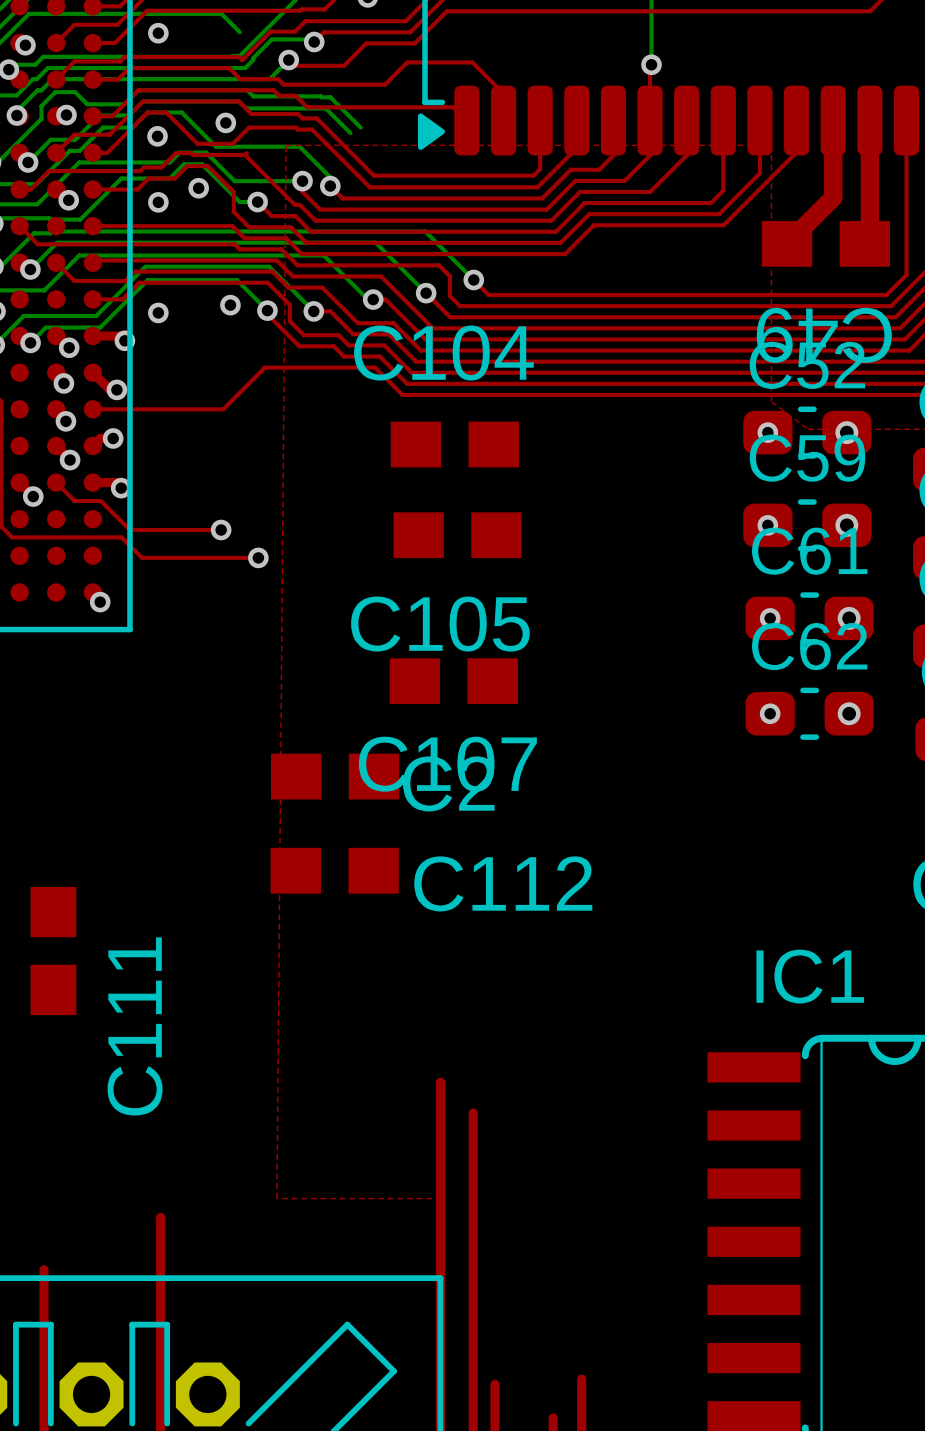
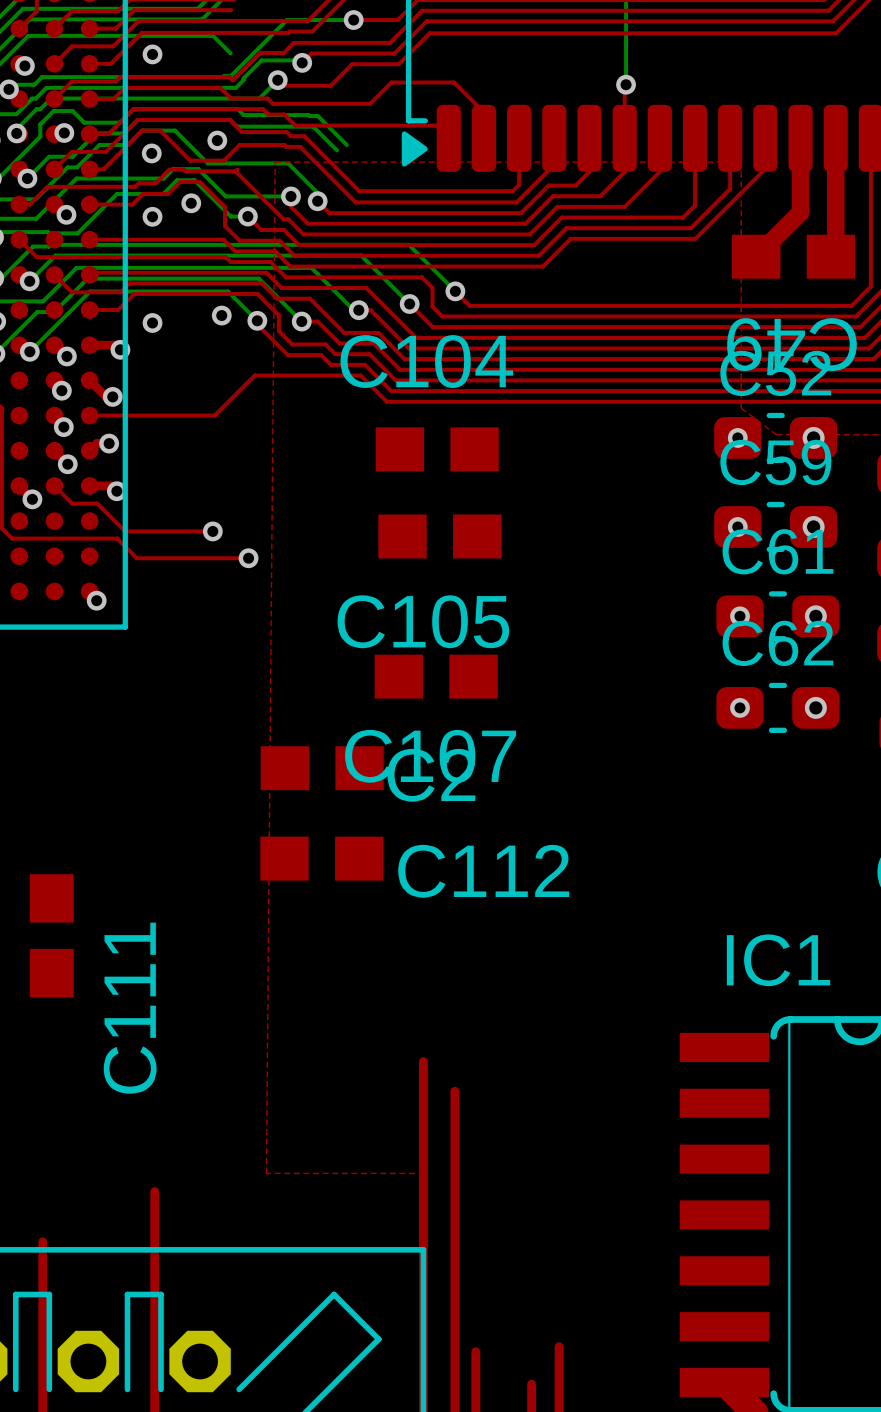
bottom track: (145, 266) (96, 315) (23, 315) -> (140, 278) (87, 278) (54, 312) (37, 312) (23, 325)
bottom track: (147, 280) (100, 327) (45, 327) -> (142, 291) (90, 291) (44, 337)

